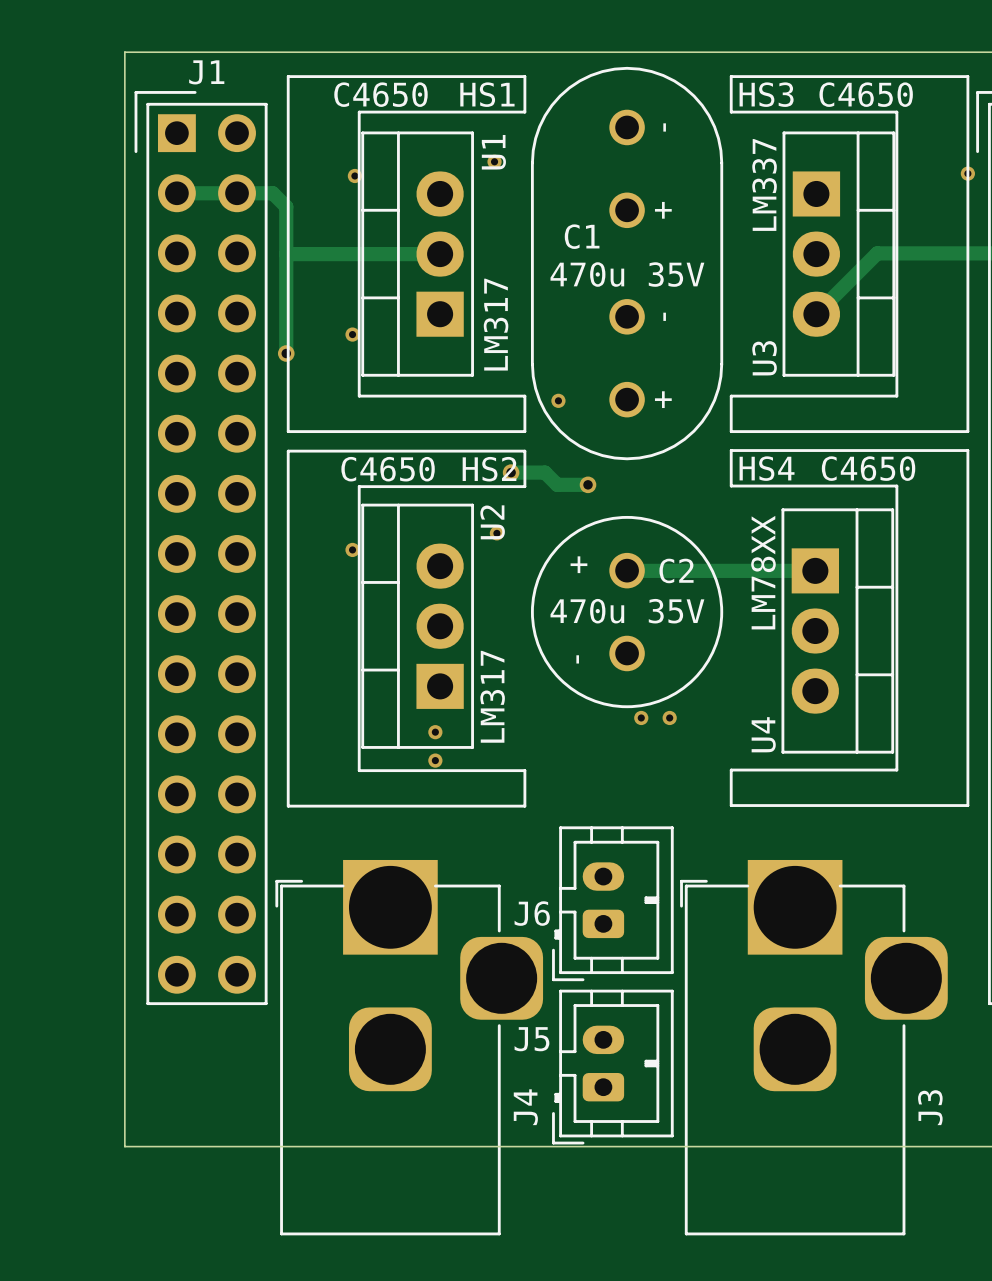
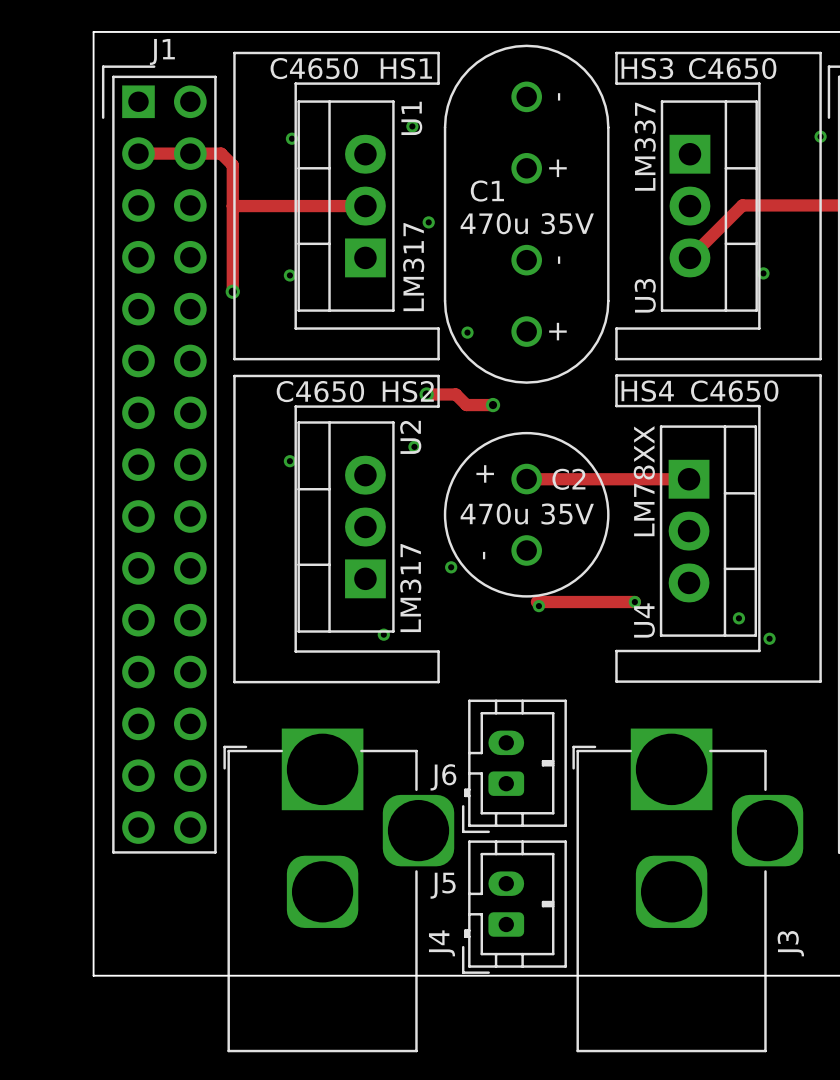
via: none -> (428, 222)
via: none -> (763, 273)
via: none -> (451, 567)
track: none -> (536, 602) (634, 602)
via: none -> (634, 602)
via: (669, 717) -> none
via: (435, 732) -> none
via: none -> (738, 618)
via: none -> (383, 634)
via: none -> (769, 638)
via: (435, 760) -> none

